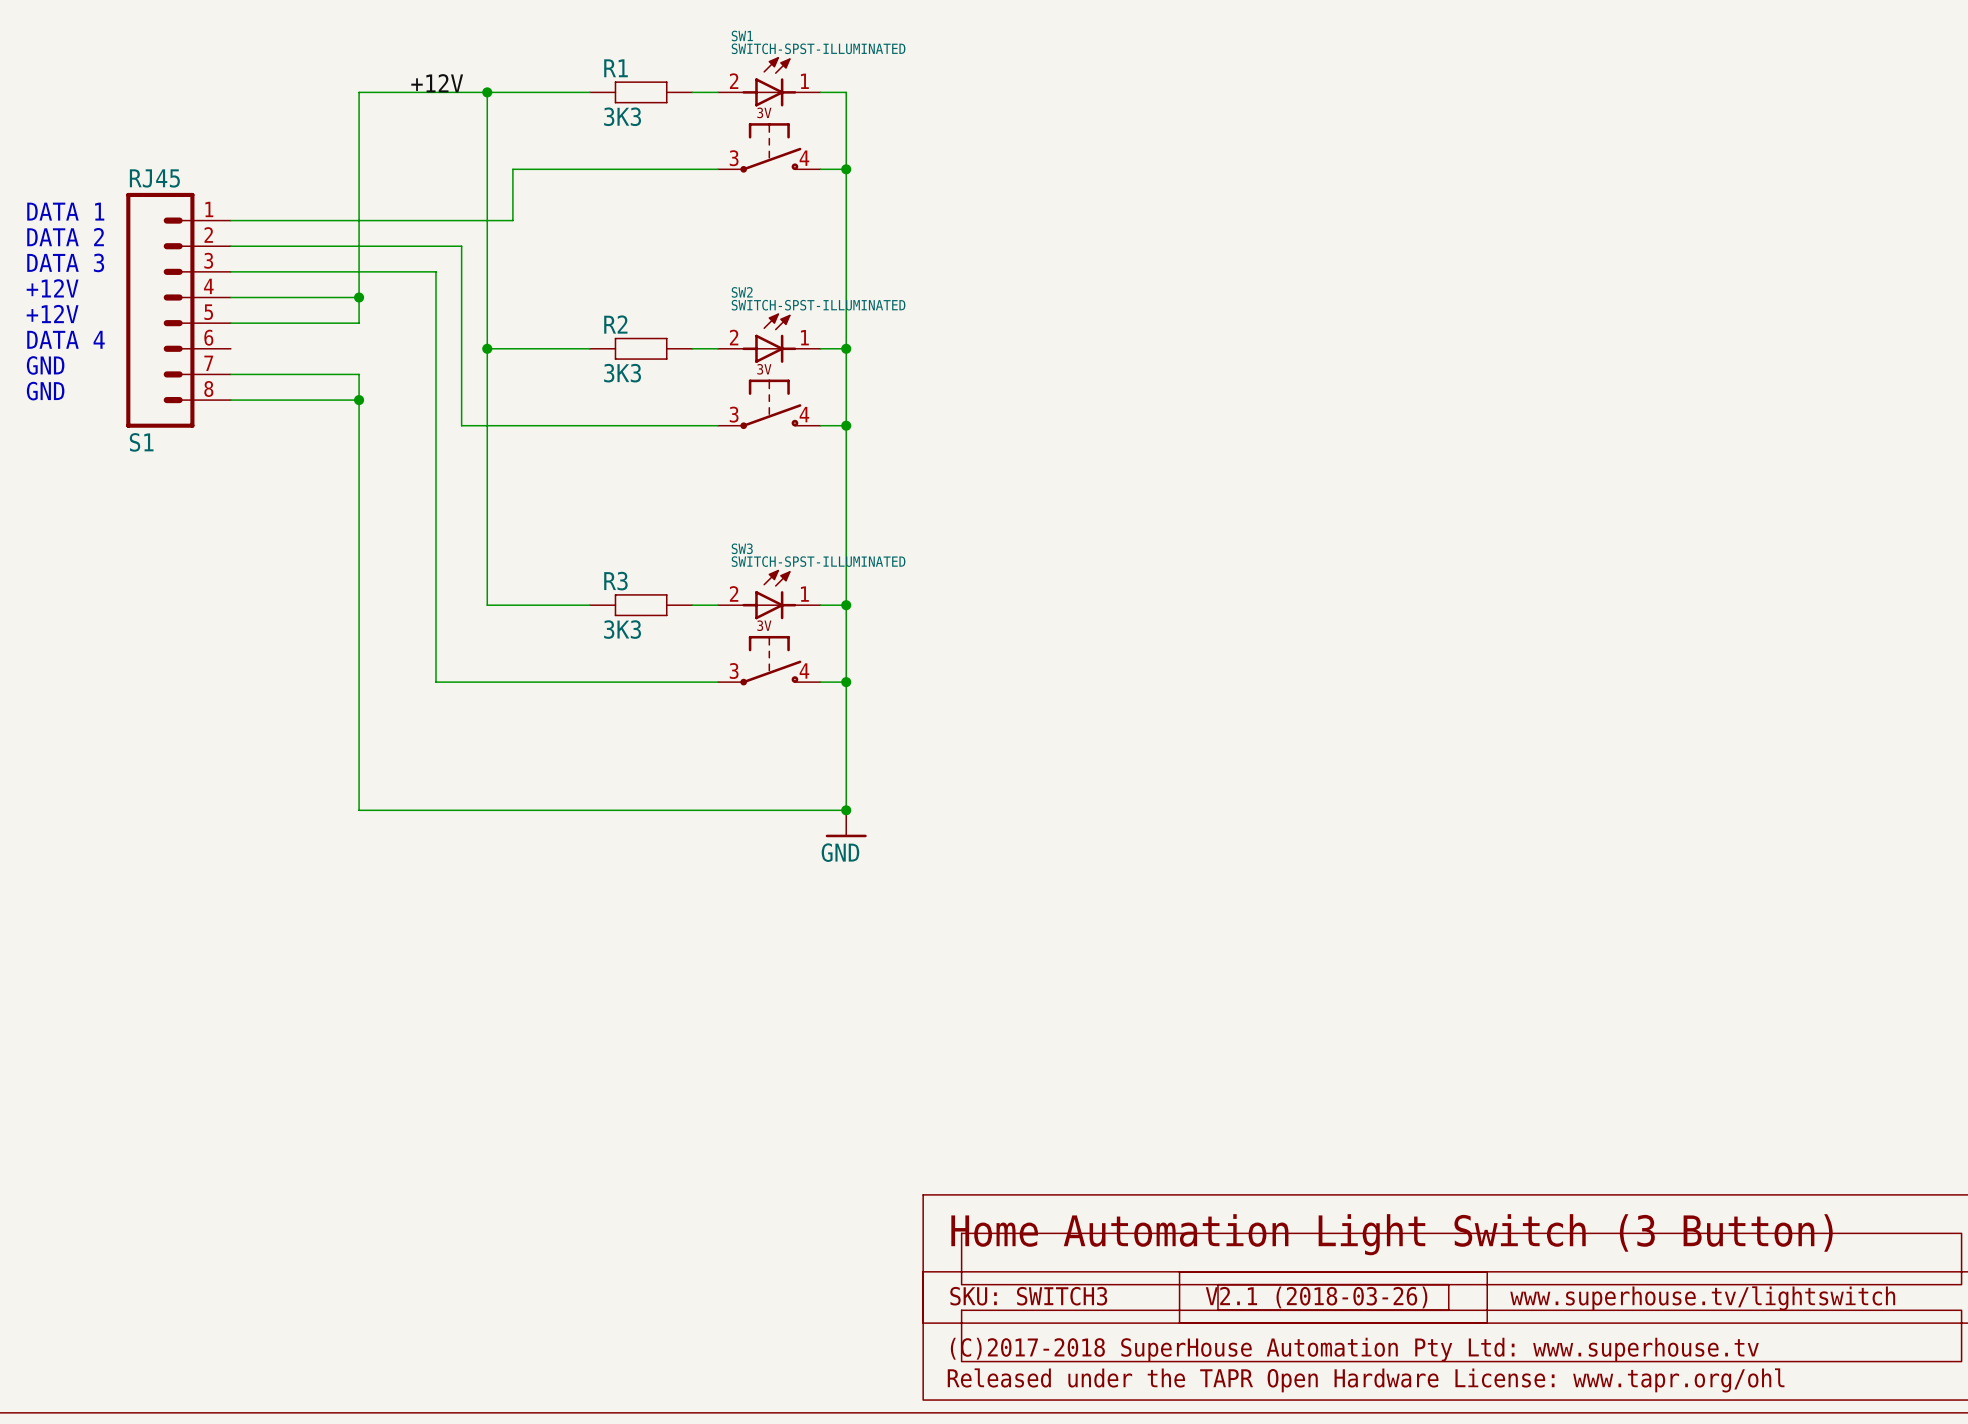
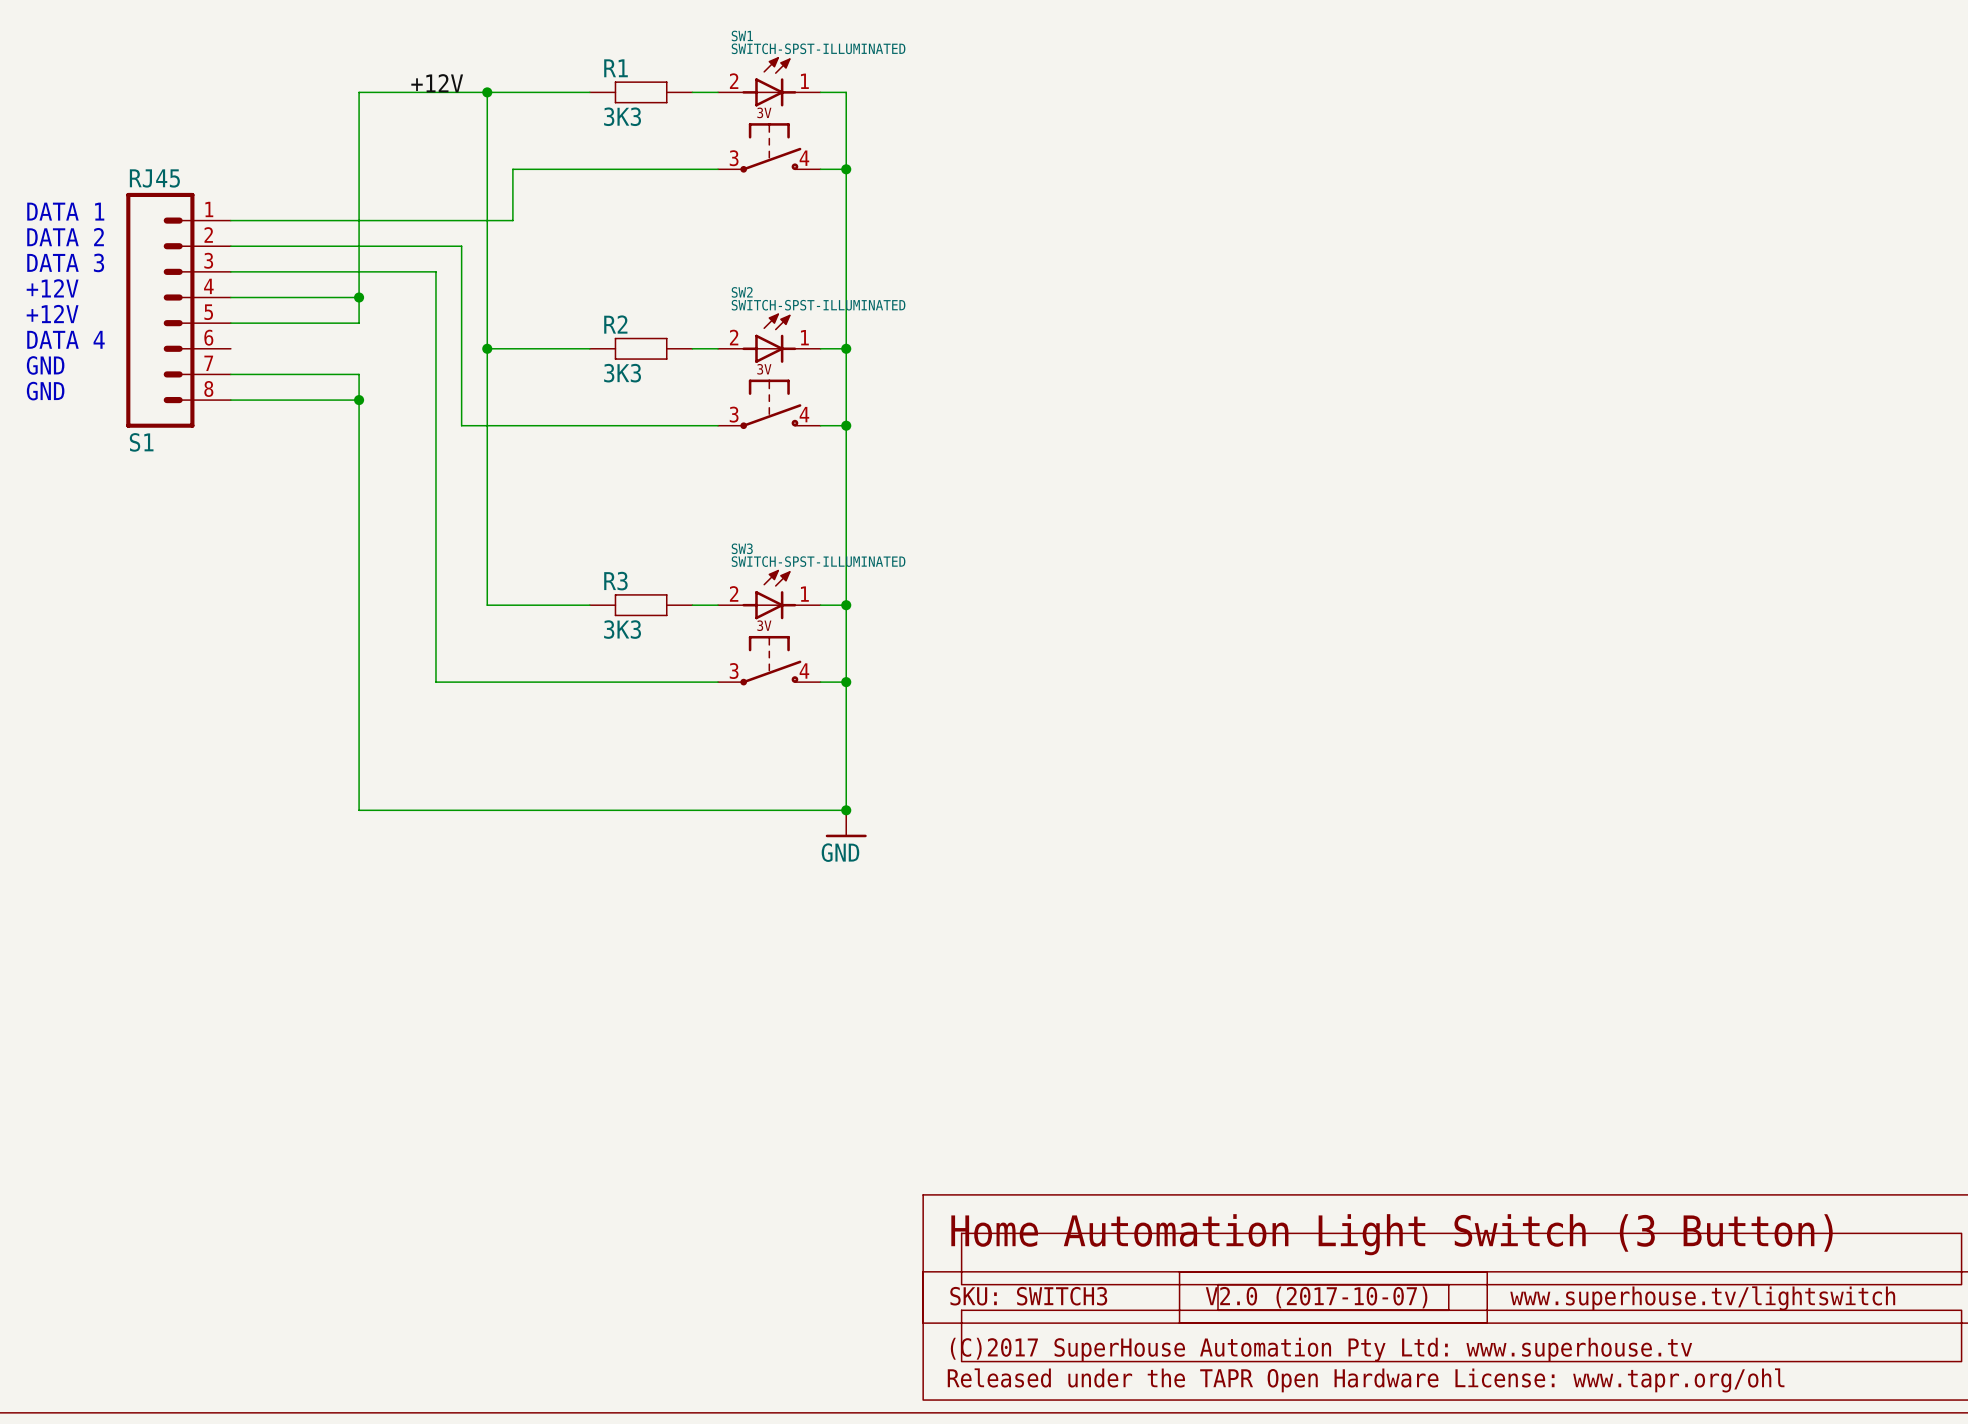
text: V2.1 (2018-03-26) (1316, 1297) -> V2.0 (2017-10-07) (1316, 1297)
text: (C)2017-2018 SuperHouse Automation Pty Ltd: www.superhouse.tv (1354, 1349) -> (C)2017 SuperHouse Automation Pty Ltd: www.superhouse.tv (1321, 1349)

